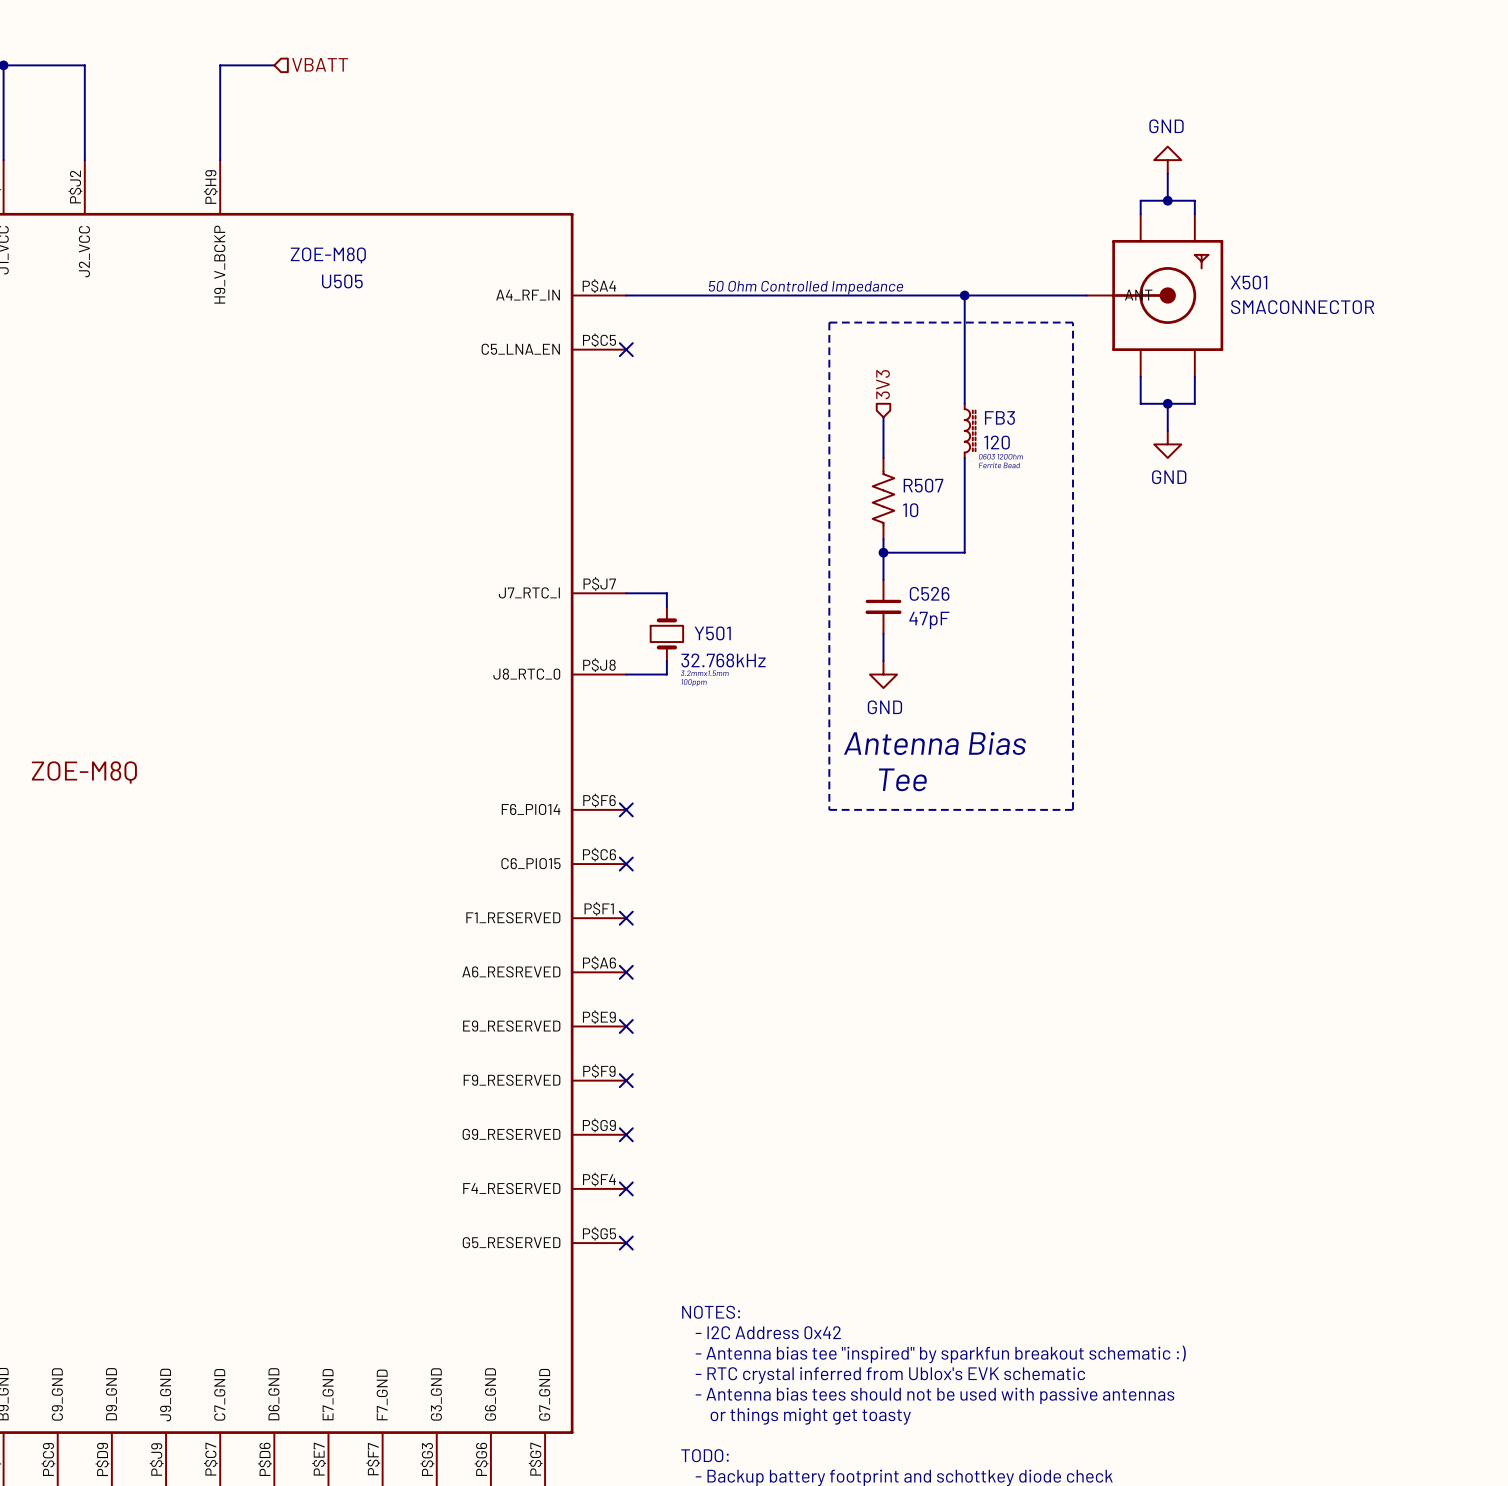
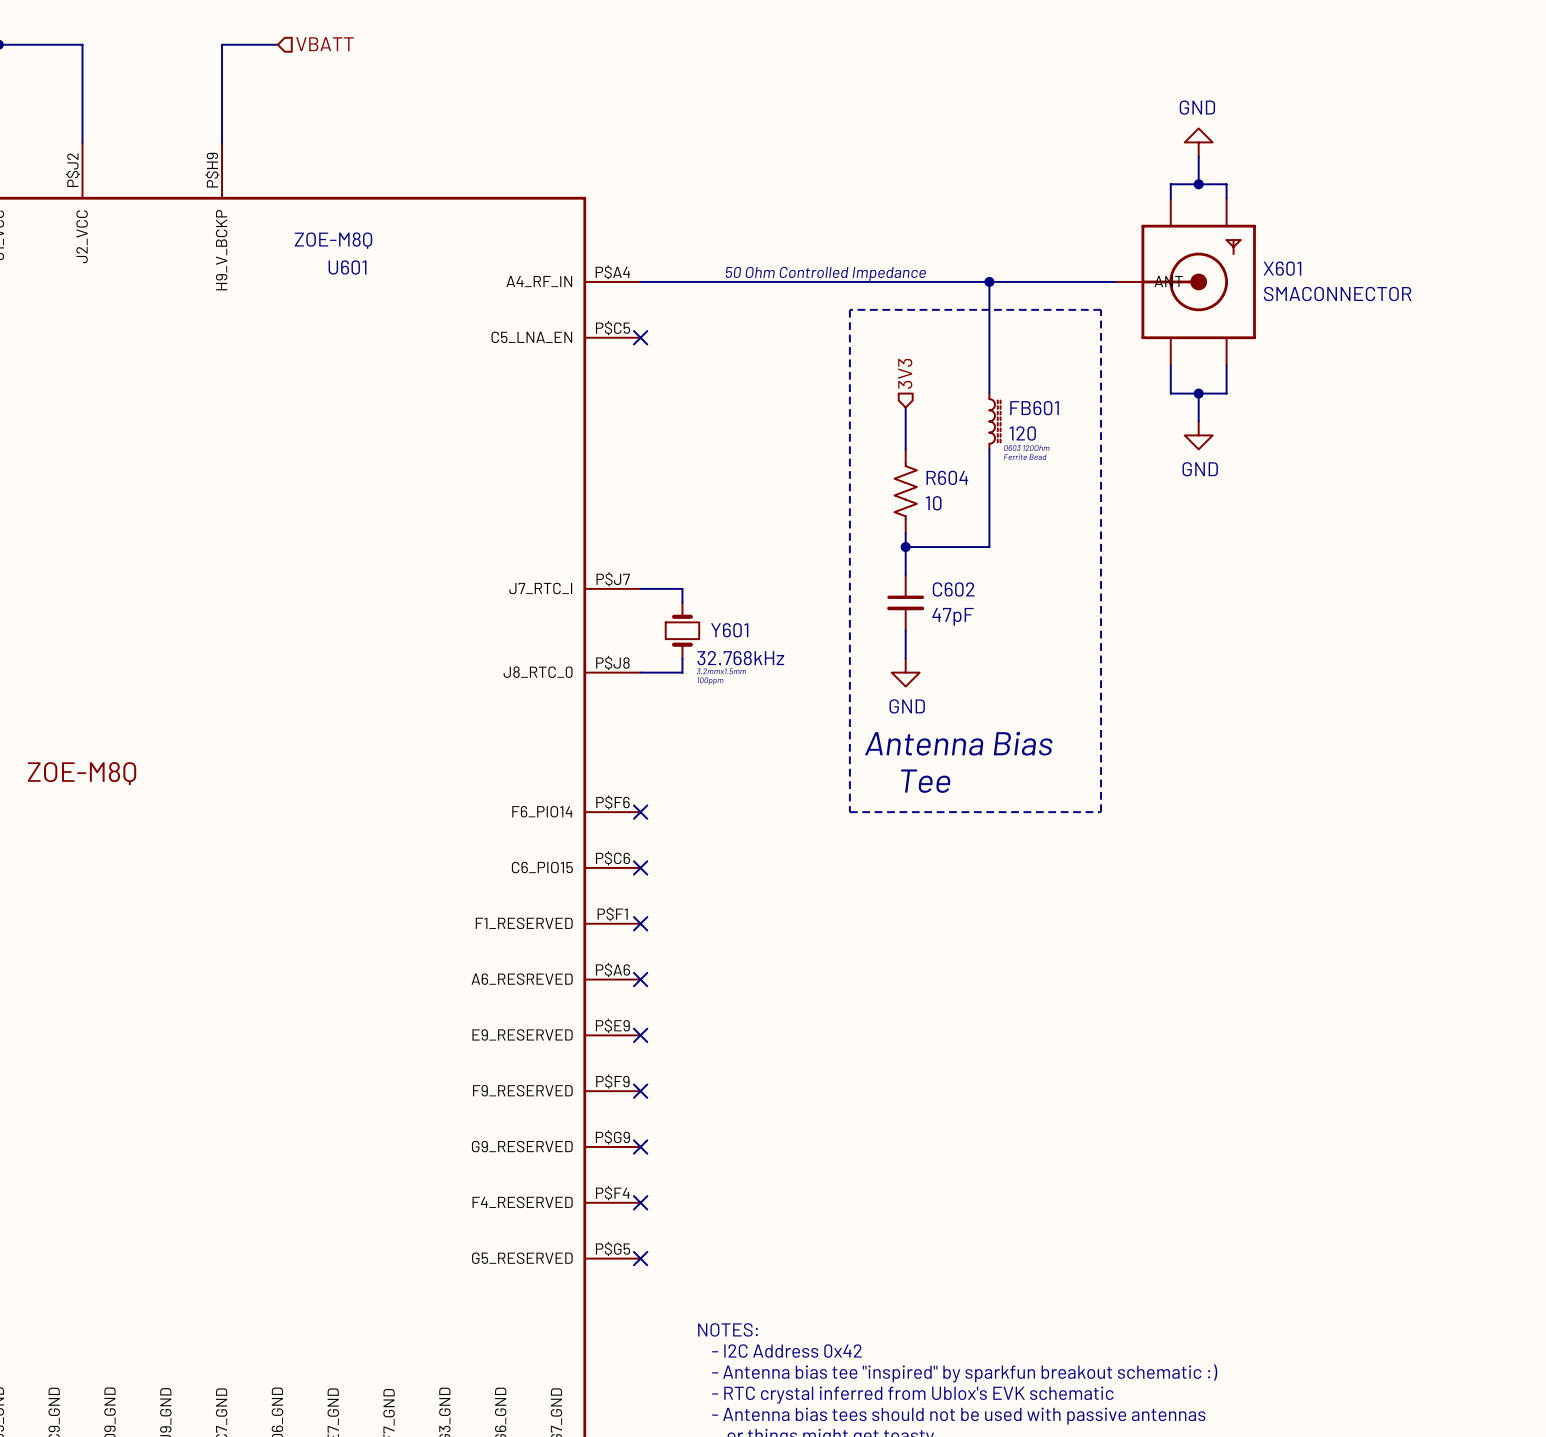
U505 name: U505 (342, 281) -> U601 (347, 267)
X501 name: X501 (1249, 282) -> X601 (1282, 268)
FB3 name: FB3 (999, 417) -> FB601 (1034, 408)
R507 name: R507 (923, 485) -> R604 (947, 477)
C526 name: C526 (929, 593) -> C602 (953, 589)
Y501 name: Y501 (712, 633) -> Y601 (729, 630)

